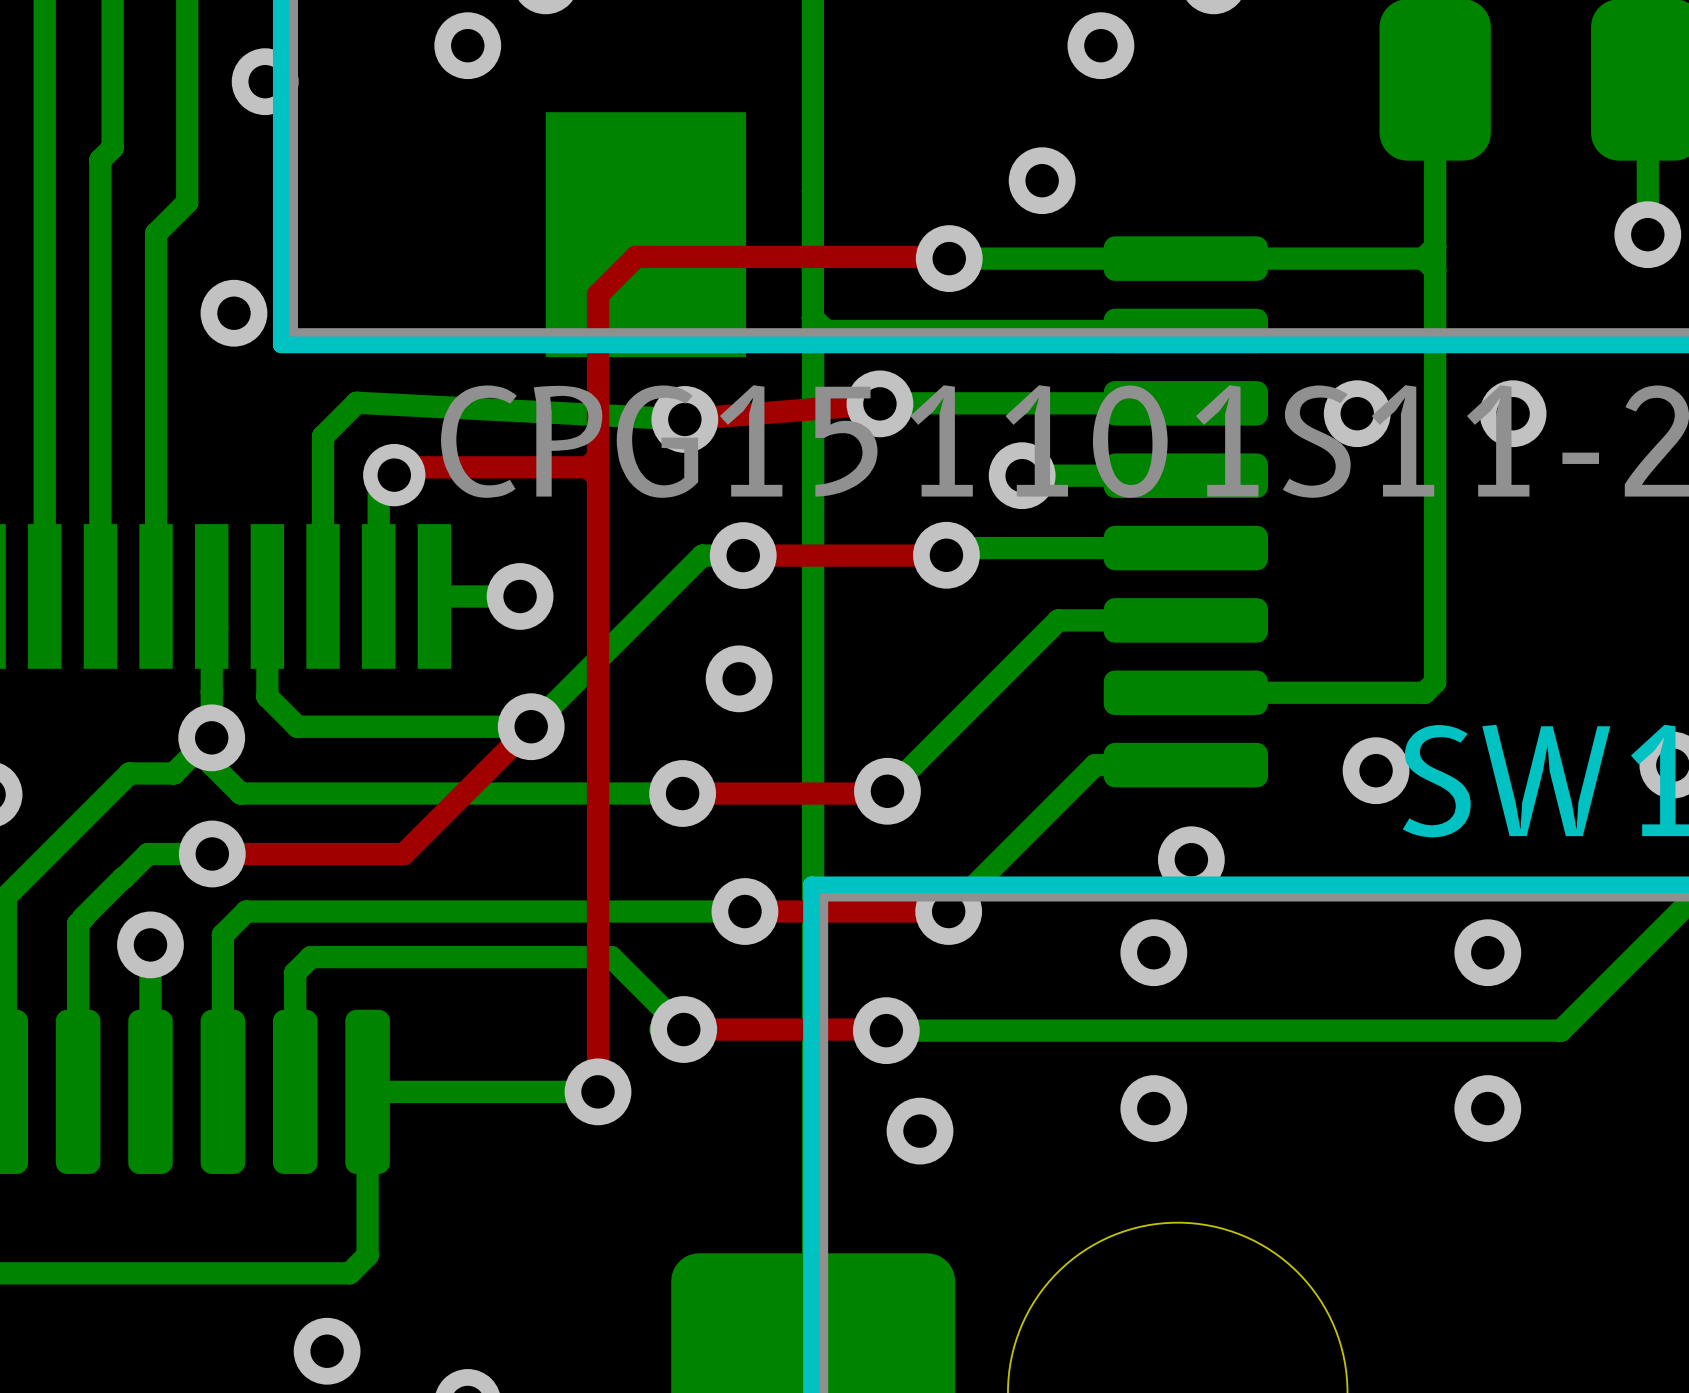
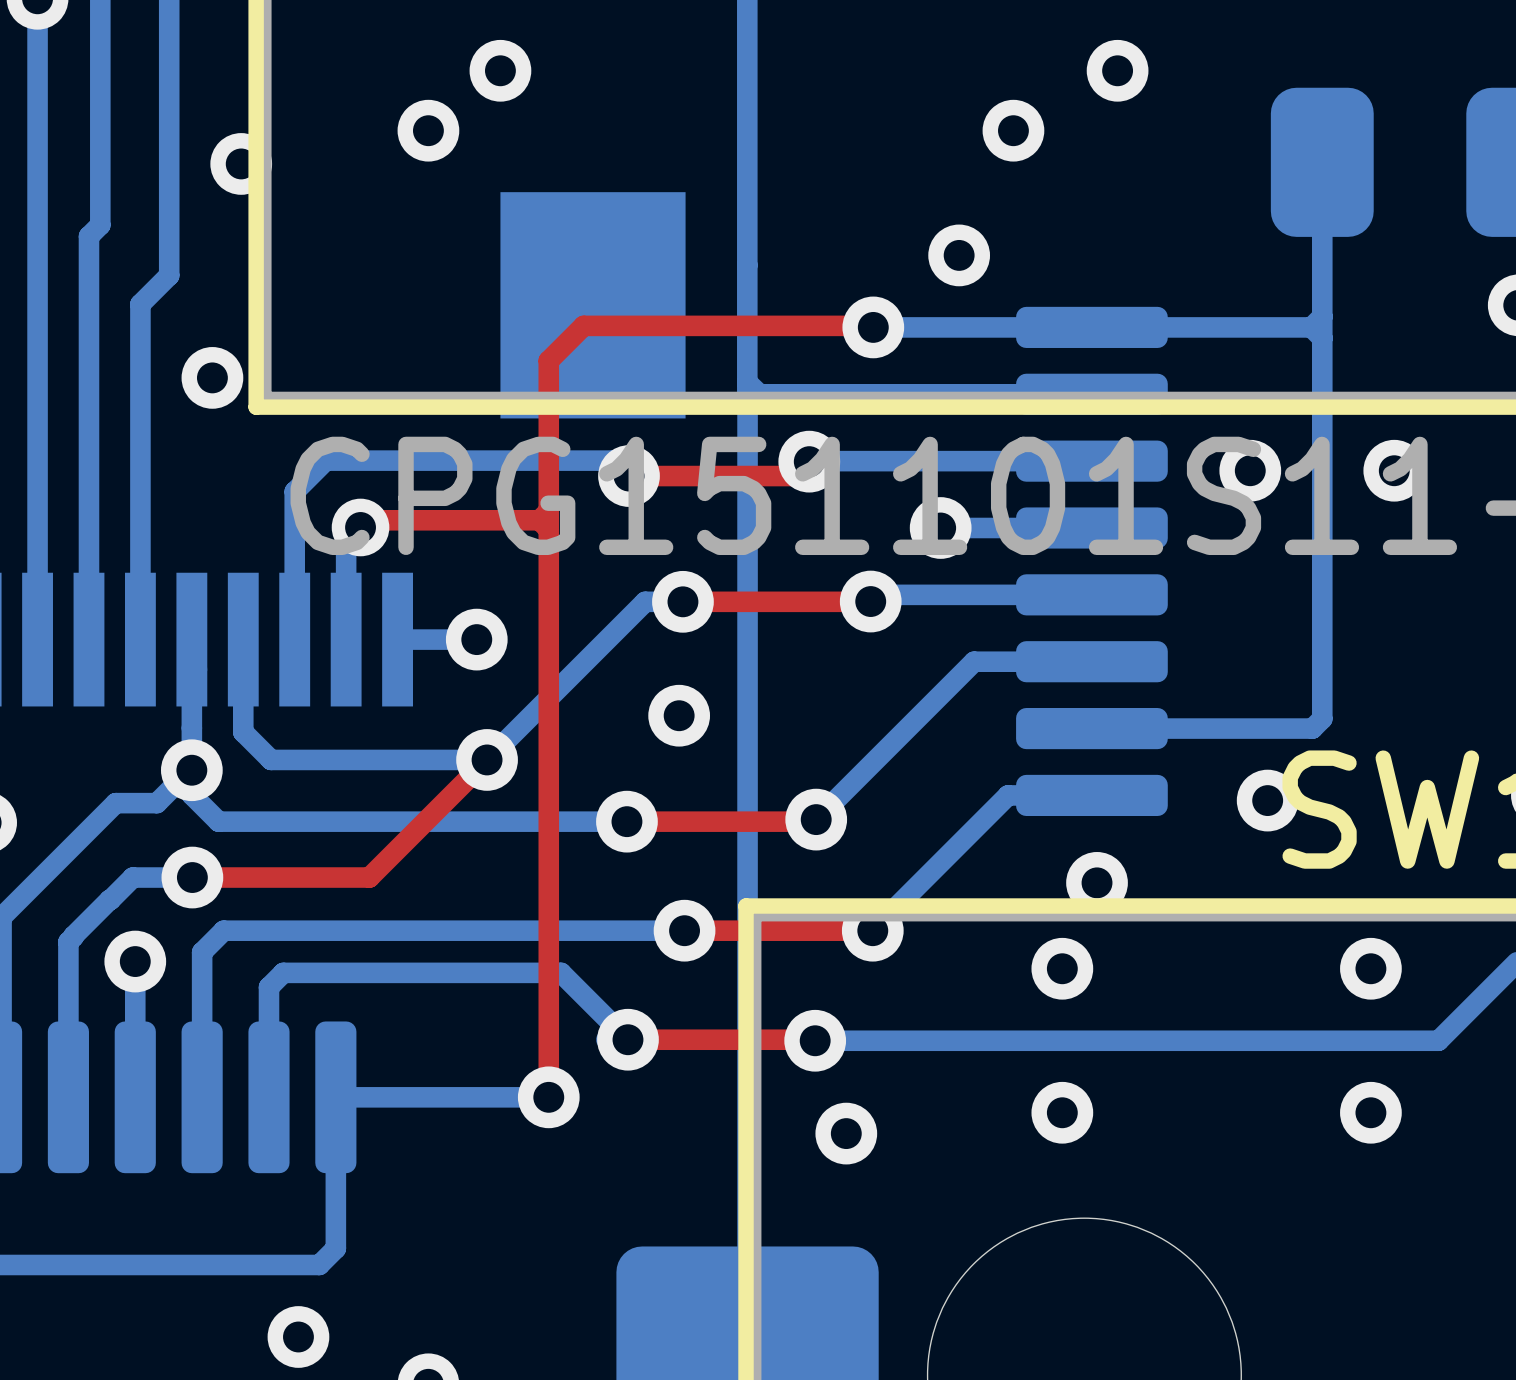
bottom track: (356, 402) (684, 419) -> (325, 460) (613, 460) (629, 476)
top track: (879, 403) (684, 419) -> (809, 476) (629, 476)

